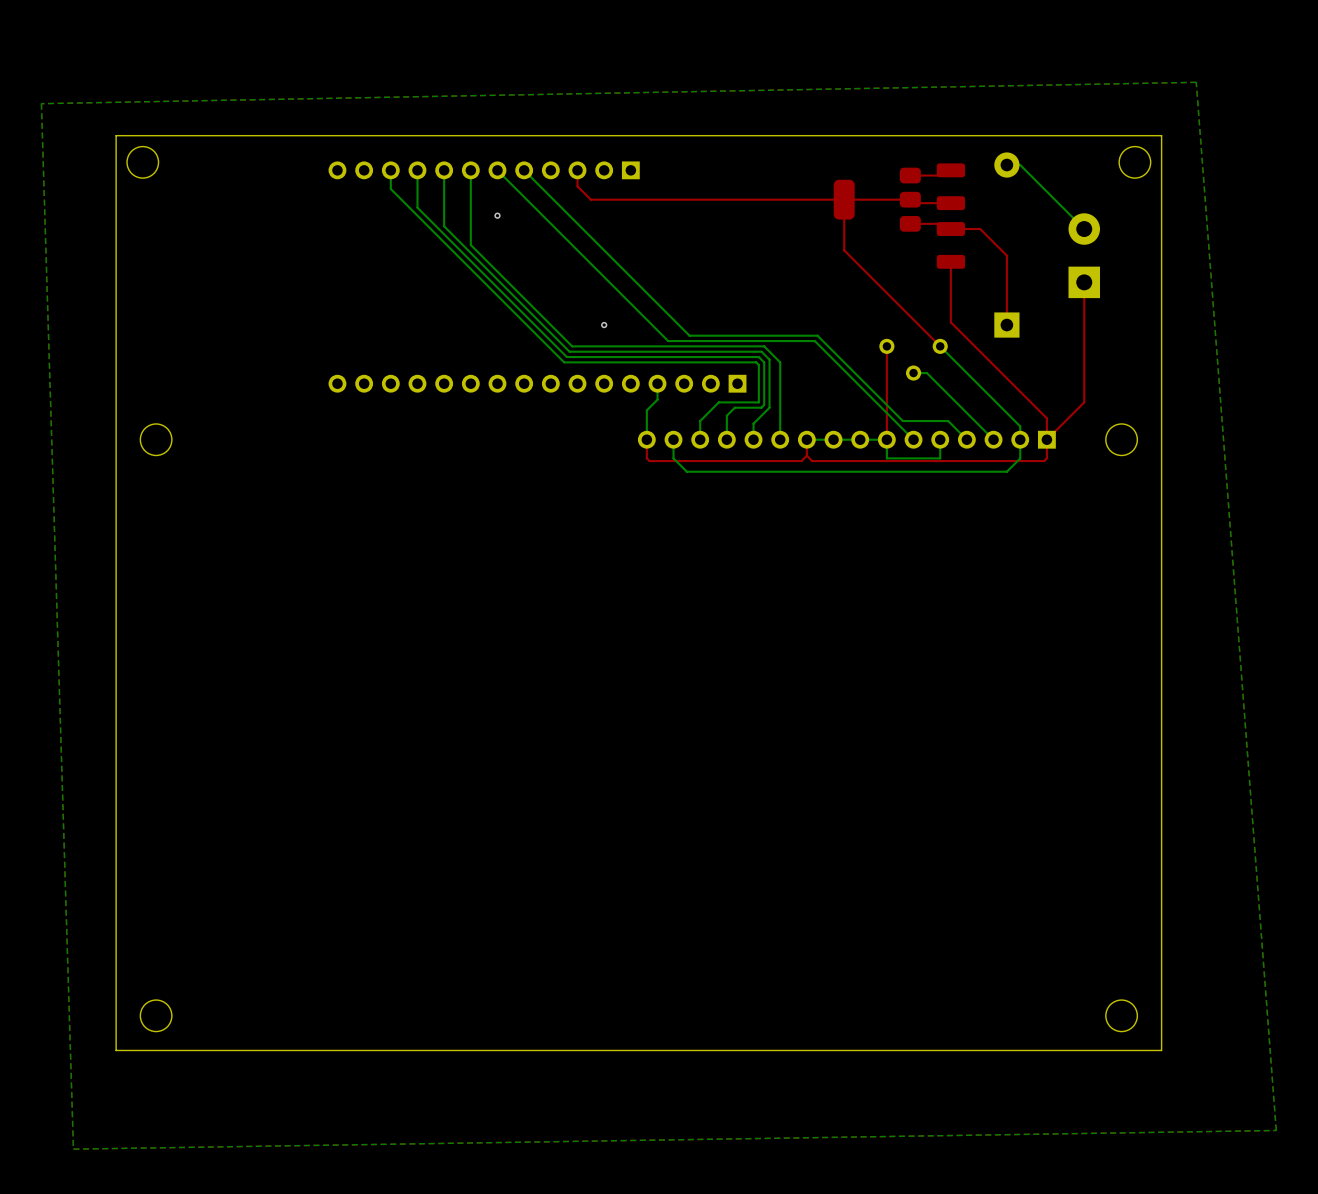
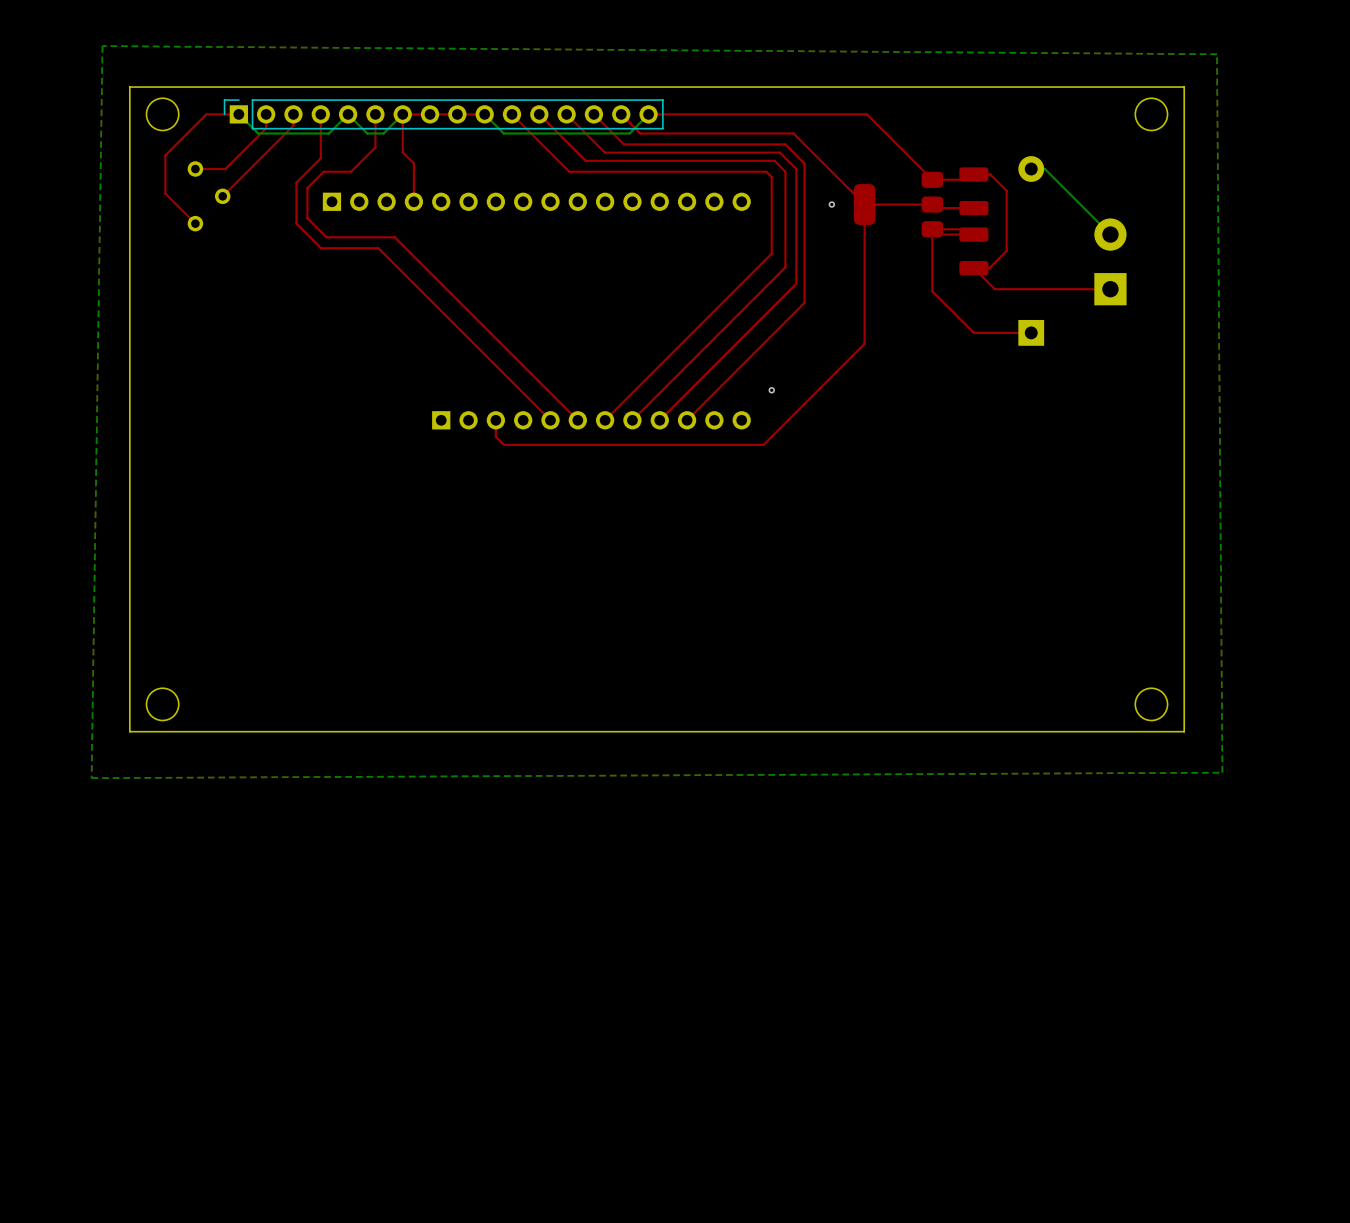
bottom zone outline: (1196, 82) (41, 103) (73, 1149) (1276, 1130) (1196, 82) -> (102, 46) (1216, 54) (1222, 772) (91, 778) (102, 46)
top track: none -> (238, 114) (206, 114) (165, 155) (165, 193) (195, 223)
top track: none -> (266, 114) (266, 128) (225, 169) (195, 169)
top track: none -> (293, 114) (293, 125) (222, 196)
top track: none -> (320, 114) (320, 158) (296, 182) (296, 223) (321, 248) (378, 248) (550, 420)
top track: none -> (375, 114) (375, 147) (351, 171) (323, 171) (307, 188) (307, 218) (326, 237) (394, 237) (577, 420)
bottom track: none -> (402, 114) (383, 133) (367, 133) (348, 114) (328, 133) (258, 133) (238, 114)
part: none -> (443, 114)
top track: none -> (484, 114) (402, 114) (402, 152) (413, 163) (413, 201)
top track: none -> (511, 114) (569, 171) (766, 171) (771, 177) (771, 253) (605, 420)
top track: none -> (539, 114) (585, 160) (774, 160) (785, 171) (785, 267) (632, 420)
top track: none -> (566, 114) (604, 152) (779, 152) (796, 169) (796, 283) (659, 420)
top track: none -> (593, 114) (623, 144) (785, 144) (804, 163) (804, 302) (687, 420)
top track: none -> (648, 114) (866, 114) (932, 179)
bottom track: none -> (648, 114) (629, 133) (503, 133) (484, 114)
board edge: (1161, 135) (116, 135) (116, 1050) (1161, 1050) (1161, 135) -> (1184, 87) (1184, 731) (129, 731) (129, 87) (1184, 87)
round board edge position: (142, 162) -> (162, 114)
round board edge position: (1134, 162) -> (1151, 114)
bottom track: (390, 170) (390, 189) (564, 362) (756, 362) (758, 365) (758, 402) (718, 402) (700, 421) (700, 439) -> none
bottom track: (417, 170) (417, 207) (566, 357) (758, 357) (764, 362) (764, 405) (761, 407) (734, 407) (726, 415) (726, 439) -> none
bottom track: (444, 170) (444, 226) (569, 351) (761, 351) (769, 359) (769, 407) (753, 423) (753, 439) -> none
bottom track: (470, 170) (470, 245) (572, 346) (764, 346) (780, 362) (780, 439) -> none
part rotation: 0° (484, 170) -> 180° (591, 420)
part position: (484, 170) -> (591, 420)
bottom track: (497, 170) (668, 341) (814, 341) (913, 439) -> none
bottom track: (524, 170) (689, 335) (817, 335) (902, 421) (948, 421) (966, 439) -> none
top track: (577, 170) (577, 186) (590, 199) (844, 199) -> (621, 114) (640, 133) (793, 133) (864, 204)
part: none -> (209, 196)
via: none -> (831, 204)
via: (497, 215) -> none
top track: (950, 229) (980, 229) (1006, 255) (1006, 325) -> (968, 234) (937, 234) (932, 229) (932, 291) (973, 332) (1031, 332)
top track: (844, 250) (940, 346) -> (864, 256) (864, 343) (763, 444) (504, 444) (495, 436) (495, 420)
top track: (950, 261) (950, 322) (1046, 418) (1046, 458) (1044, 461) (812, 461) (806, 455) -> none
top track: (1084, 282) (1084, 402) (1046, 439) -> (1110, 289) (994, 289) (973, 268) (989, 268) (1006, 250) (1006, 190) (990, 174) (973, 174)
via: (604, 325) -> none
top track: (886, 346) (886, 439) -> none
bottom track: (940, 346) (1020, 426) (1020, 458) (1006, 471) (686, 471) (673, 458) (673, 439) -> none
part: (913, 359) -> none
bottom track: (913, 373) (926, 373) (993, 439) -> none
via: none -> (771, 390)
part rotation: 0° (537, 383) -> 180° (536, 201)
bottom track: (657, 383) (657, 399) (646, 410) (646, 439) -> none
round board edge: [140, 423, 173, 456] -> none
round board edge: [1105, 423, 1138, 456] -> none
top track: (646, 439) (646, 458) (649, 461) (801, 461) (806, 455) -> none
top track: (806, 439) (806, 455) -> none
part: (846, 439) -> none
bottom track: (940, 439) (940, 458) (886, 458) (886, 439) (806, 439) -> none
round board edge: none -> [146, 687, 180, 721]
round board edge: none -> [1135, 687, 1168, 721]
round board edge: [140, 999, 173, 1032] -> none
round board edge: [1105, 999, 1138, 1032] -> none

